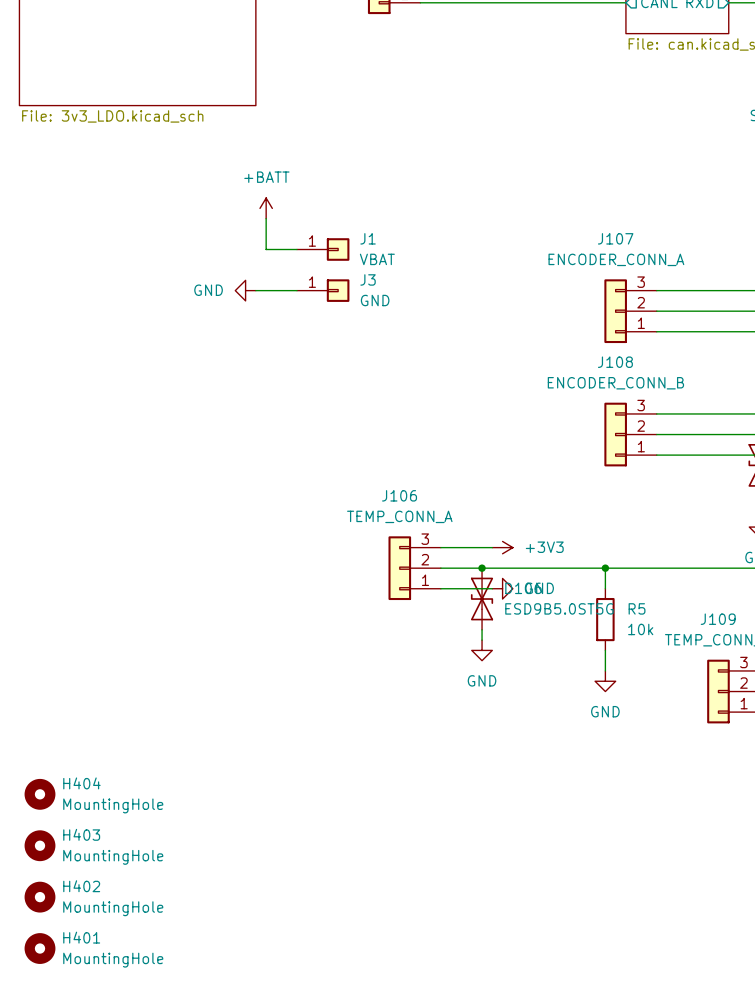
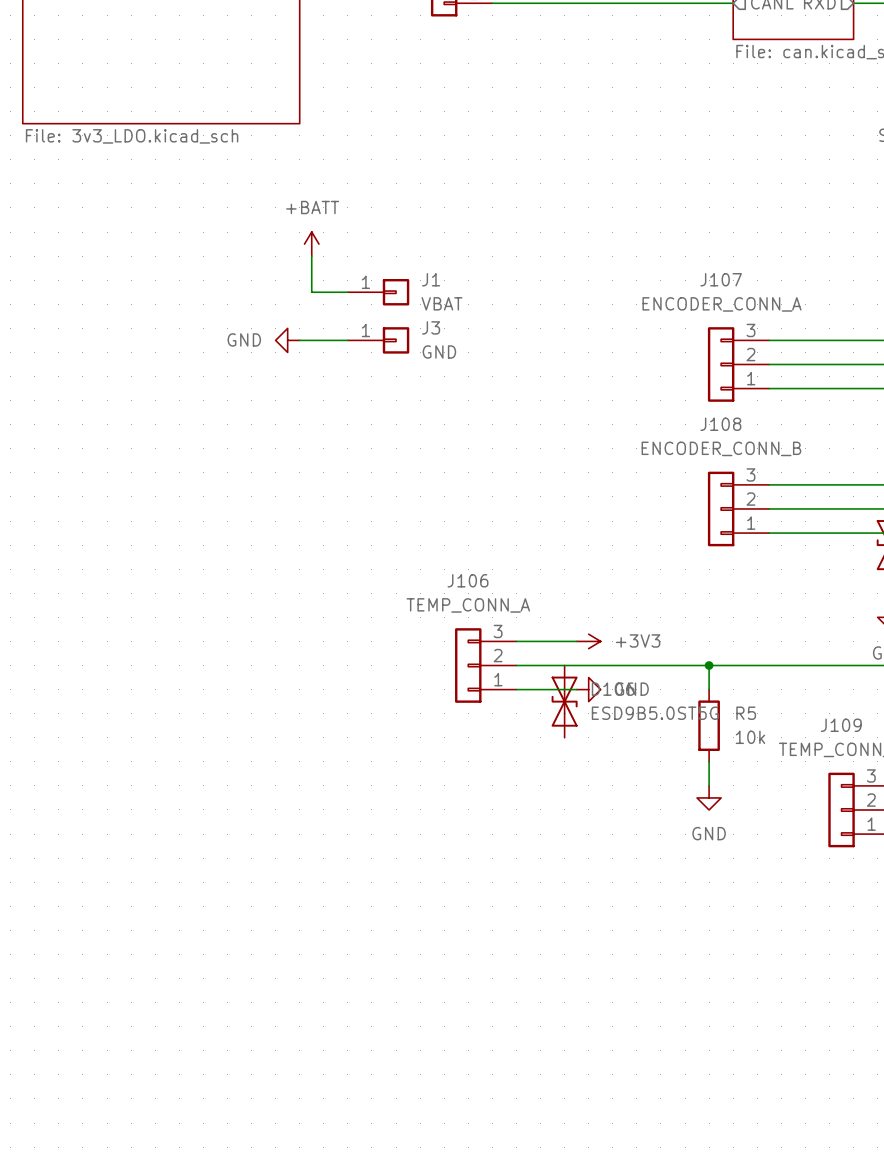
junction: (482, 568) -> none
wire: (482, 629) (482, 640) -> none
power symbol: GND (482, 650) -> none
H404: MountingHole (40, 794) -> none
H403: MountingHole (40, 845) -> none
H402: MountingHole (40, 897) -> none
H401: MountingHole (40, 948) -> none

